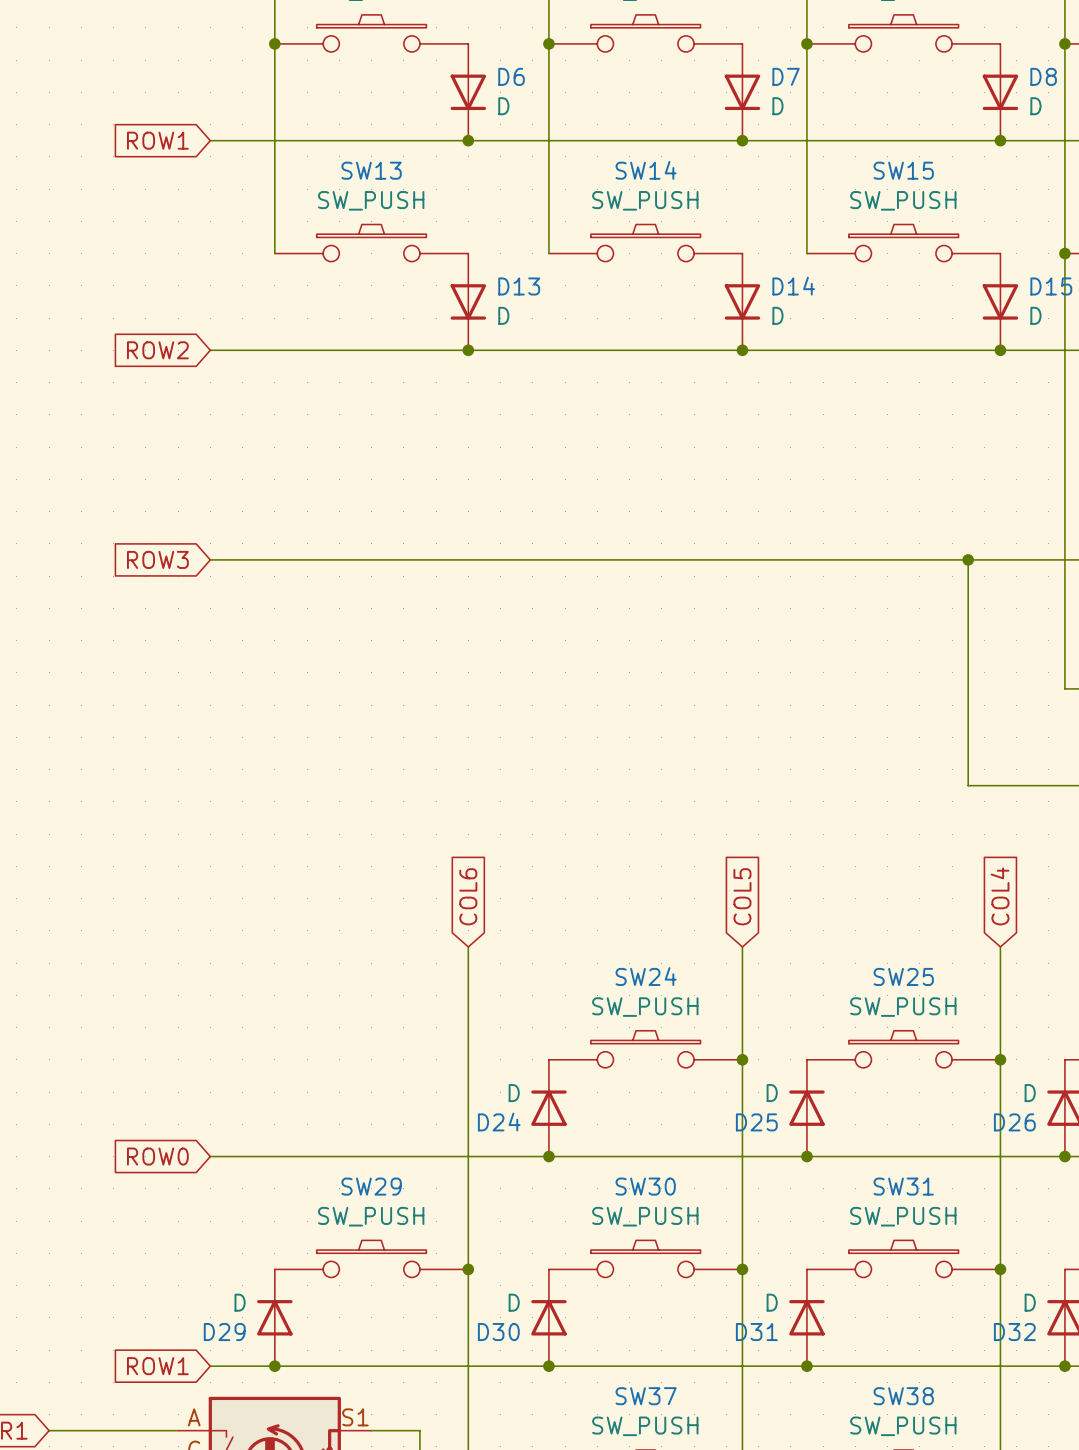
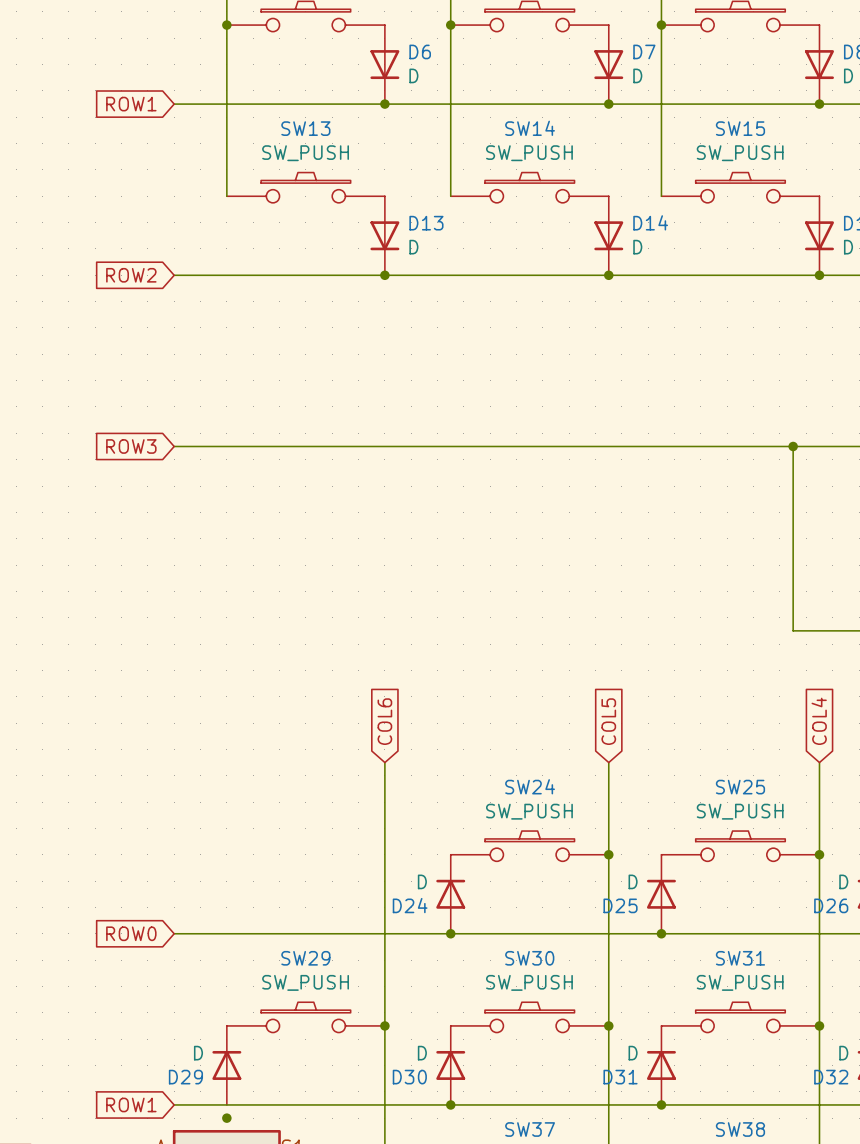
junction position: (274, 1366) -> (226, 1118)

